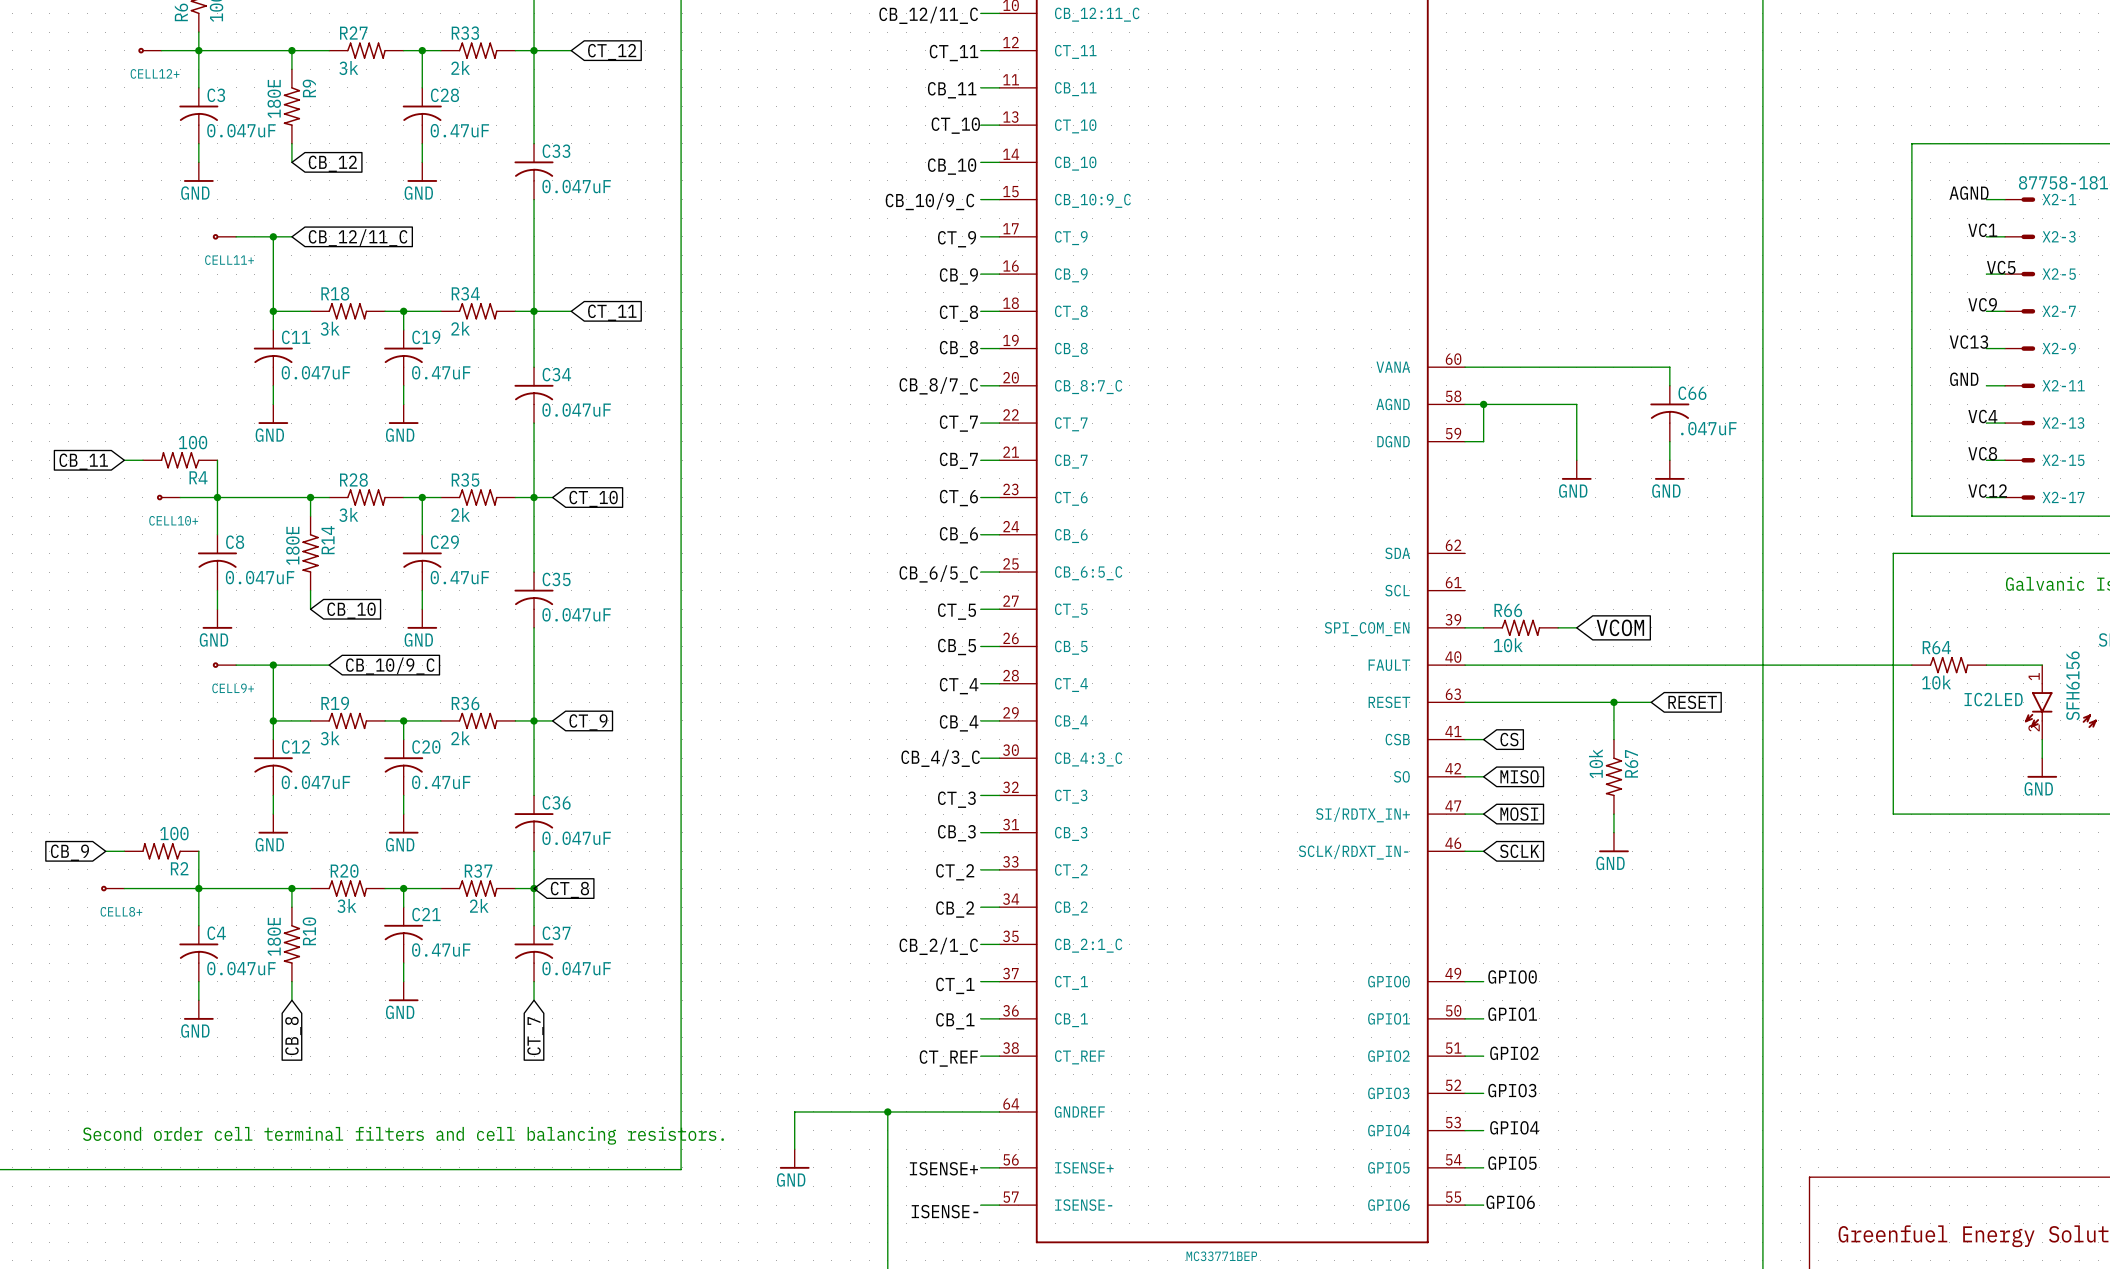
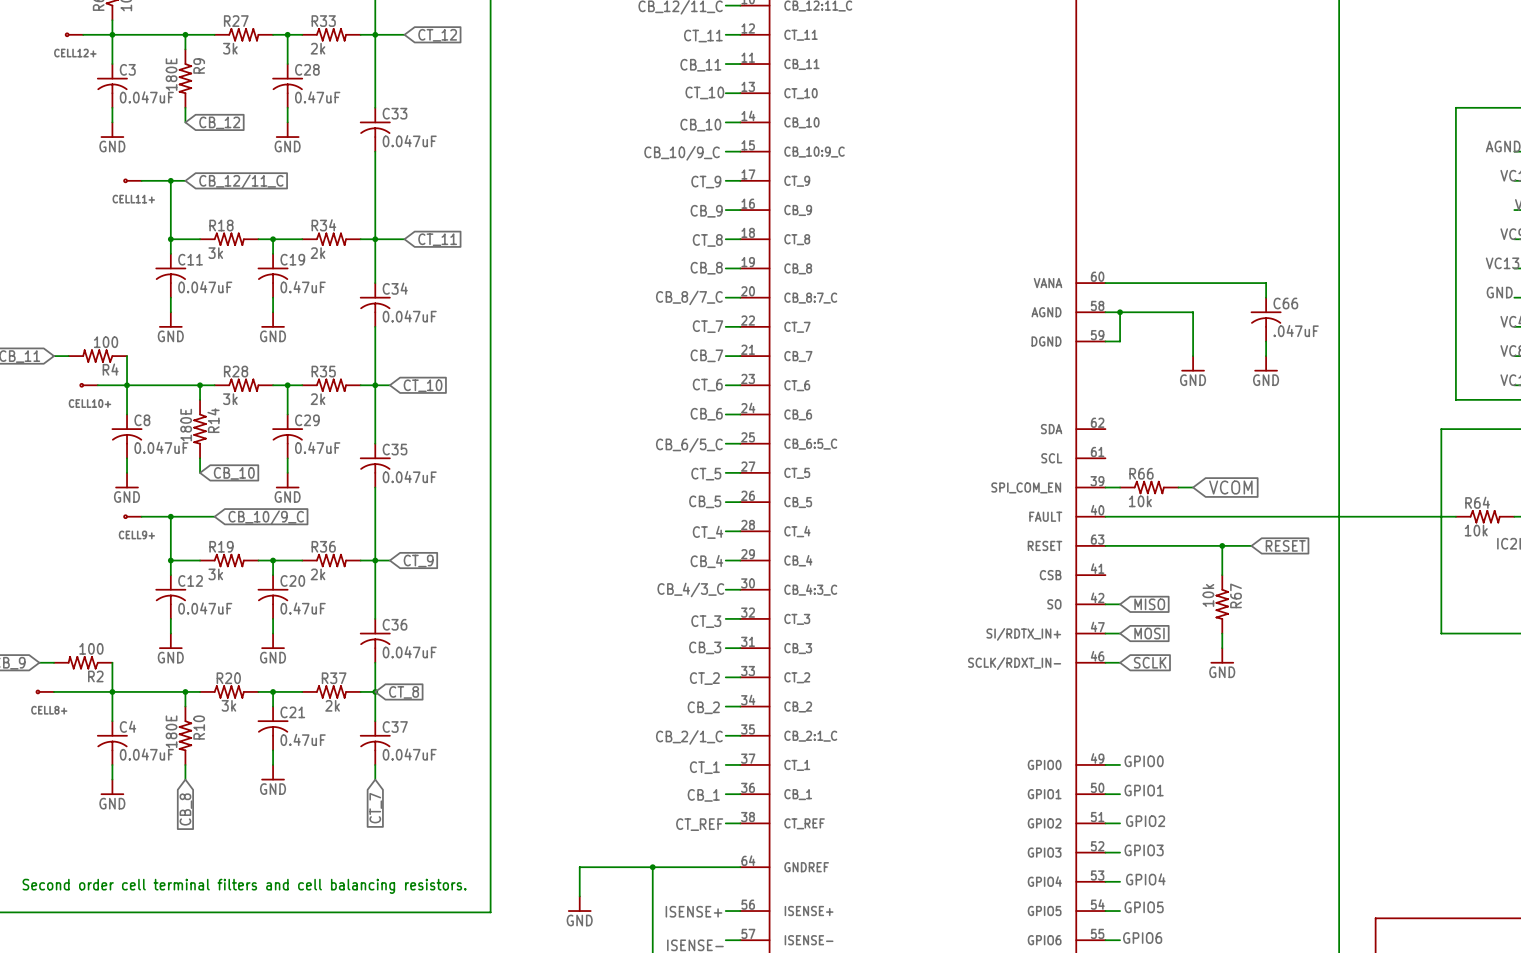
wire: (1465, 739) (1483, 739) -> none
global label: CS (1509, 739) -> none

